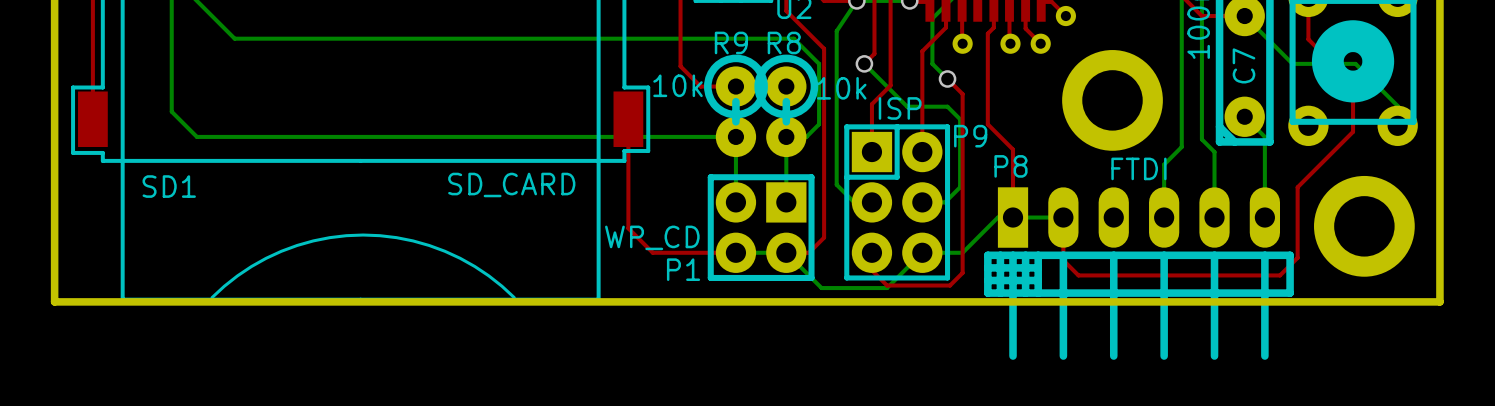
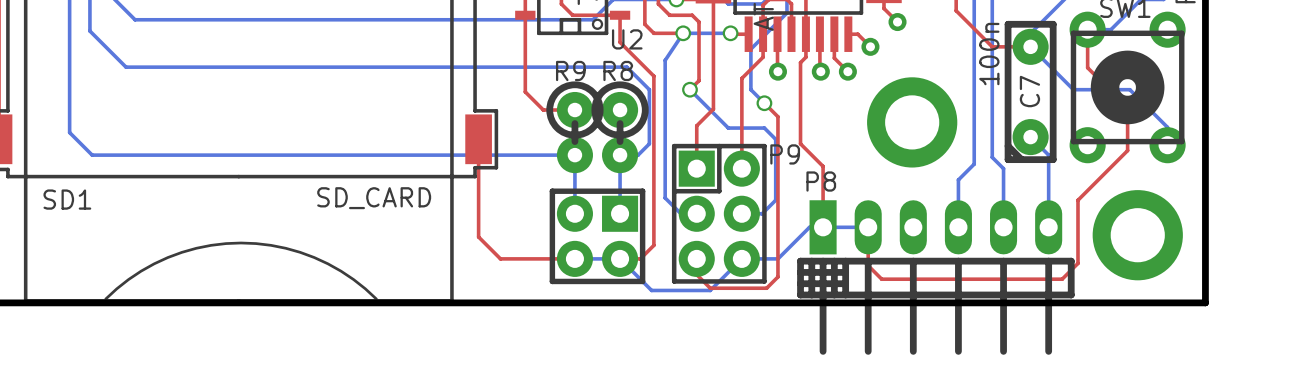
R9 value: 10k (678, 85) -> none
R8 value: 10k (841, 88) -> none
P9 value: ISP (900, 108) -> none
P8 value: FTDI (1138, 168) -> none
P1 value: WP_CD (652, 237) -> none
P1 name: P1 (683, 269) -> none

